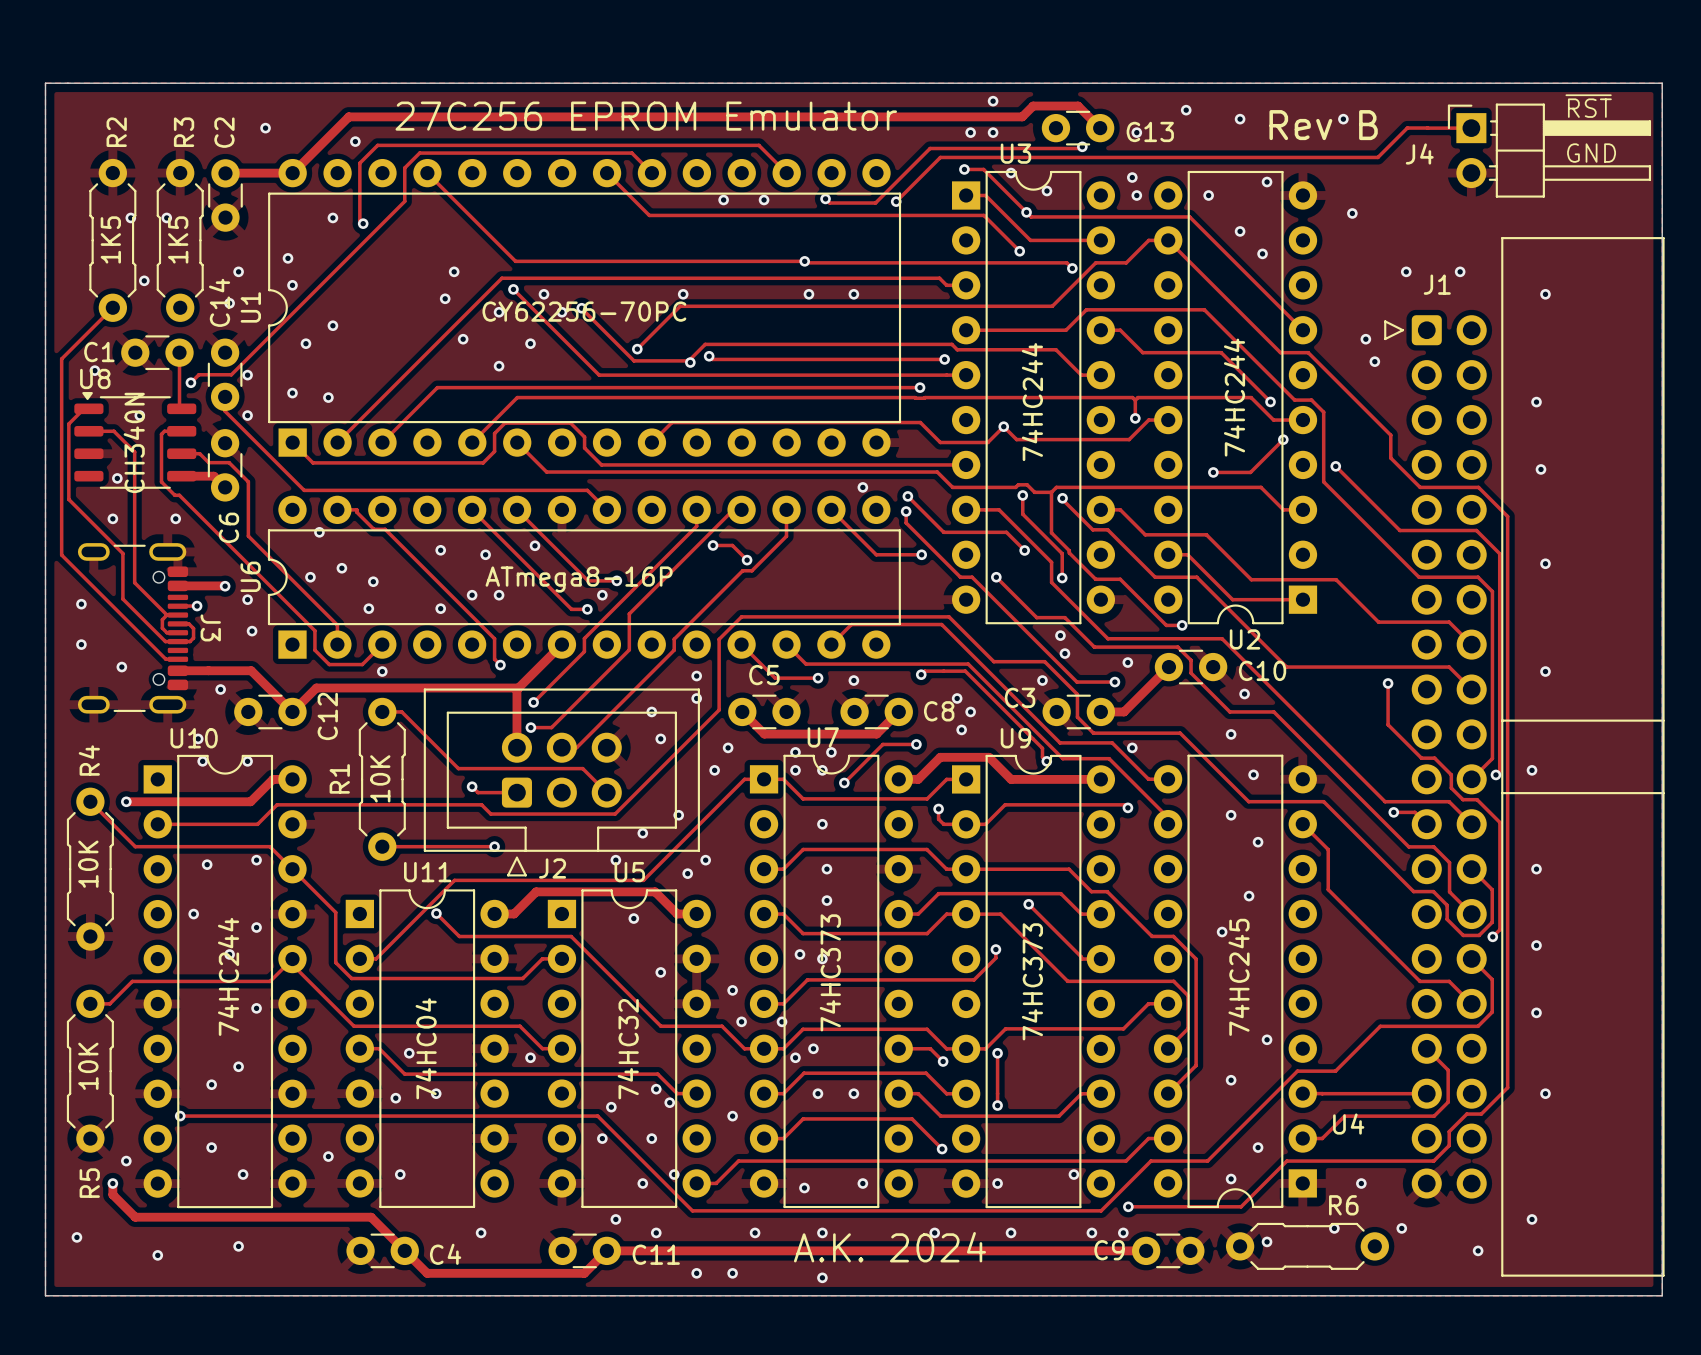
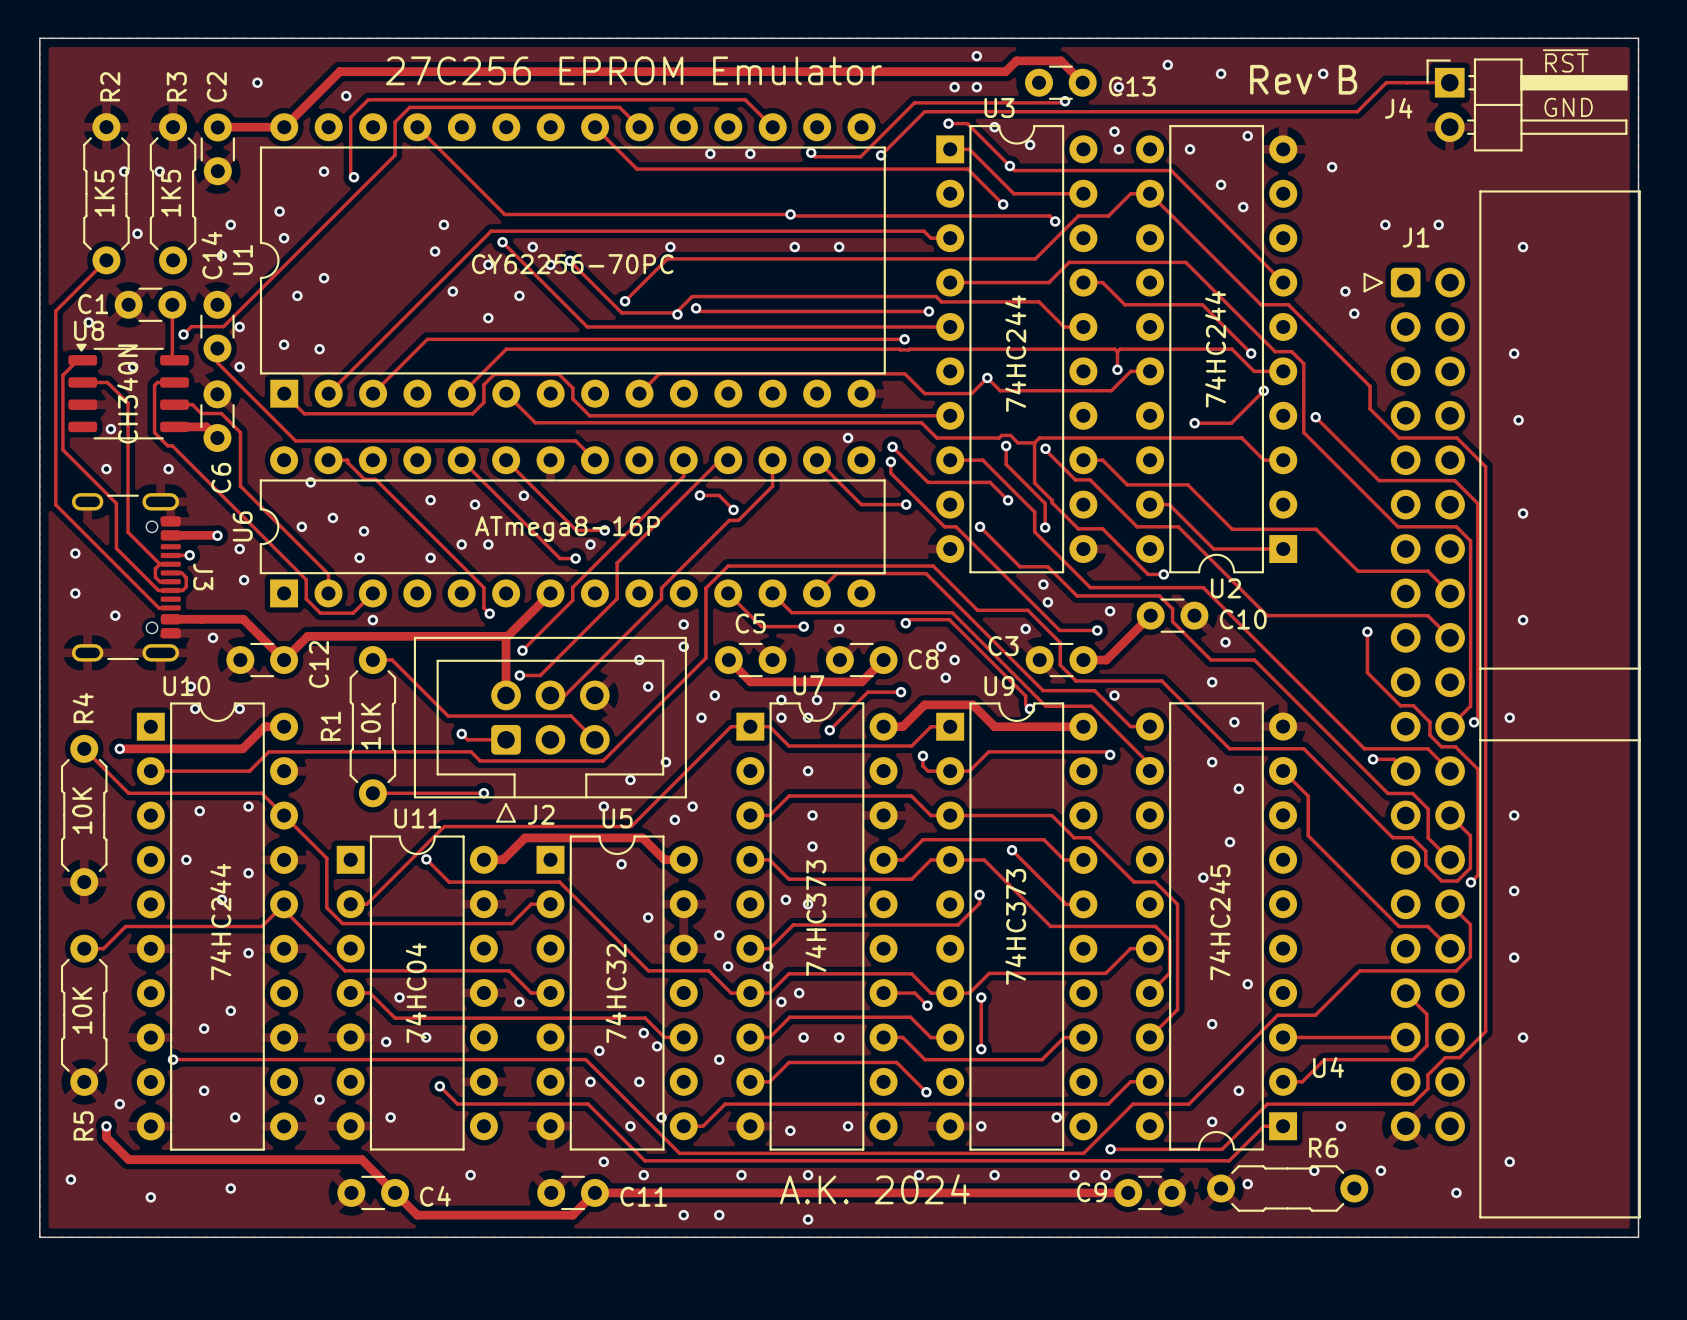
track: none -> (439, 1086) (457, 1104) (588, 1104) (644, 1160) (1229, 1160) (1263, 1126) (1283, 1126)
via: none -> (439, 1086)

